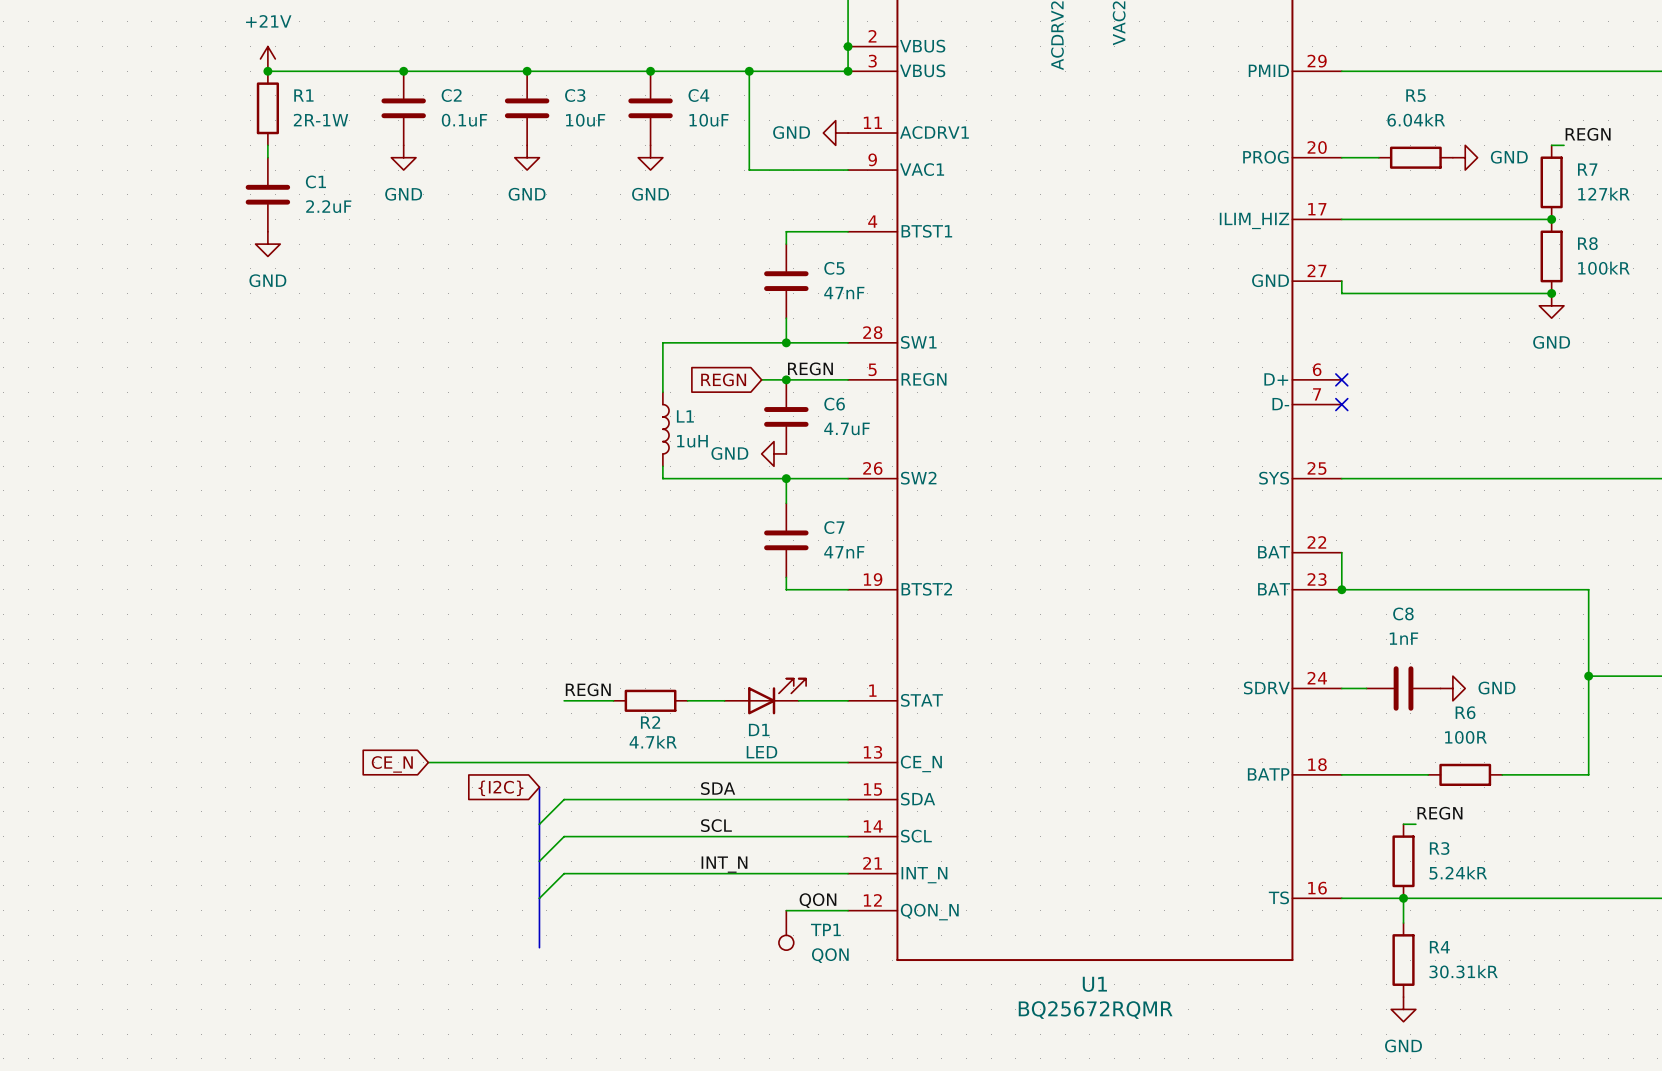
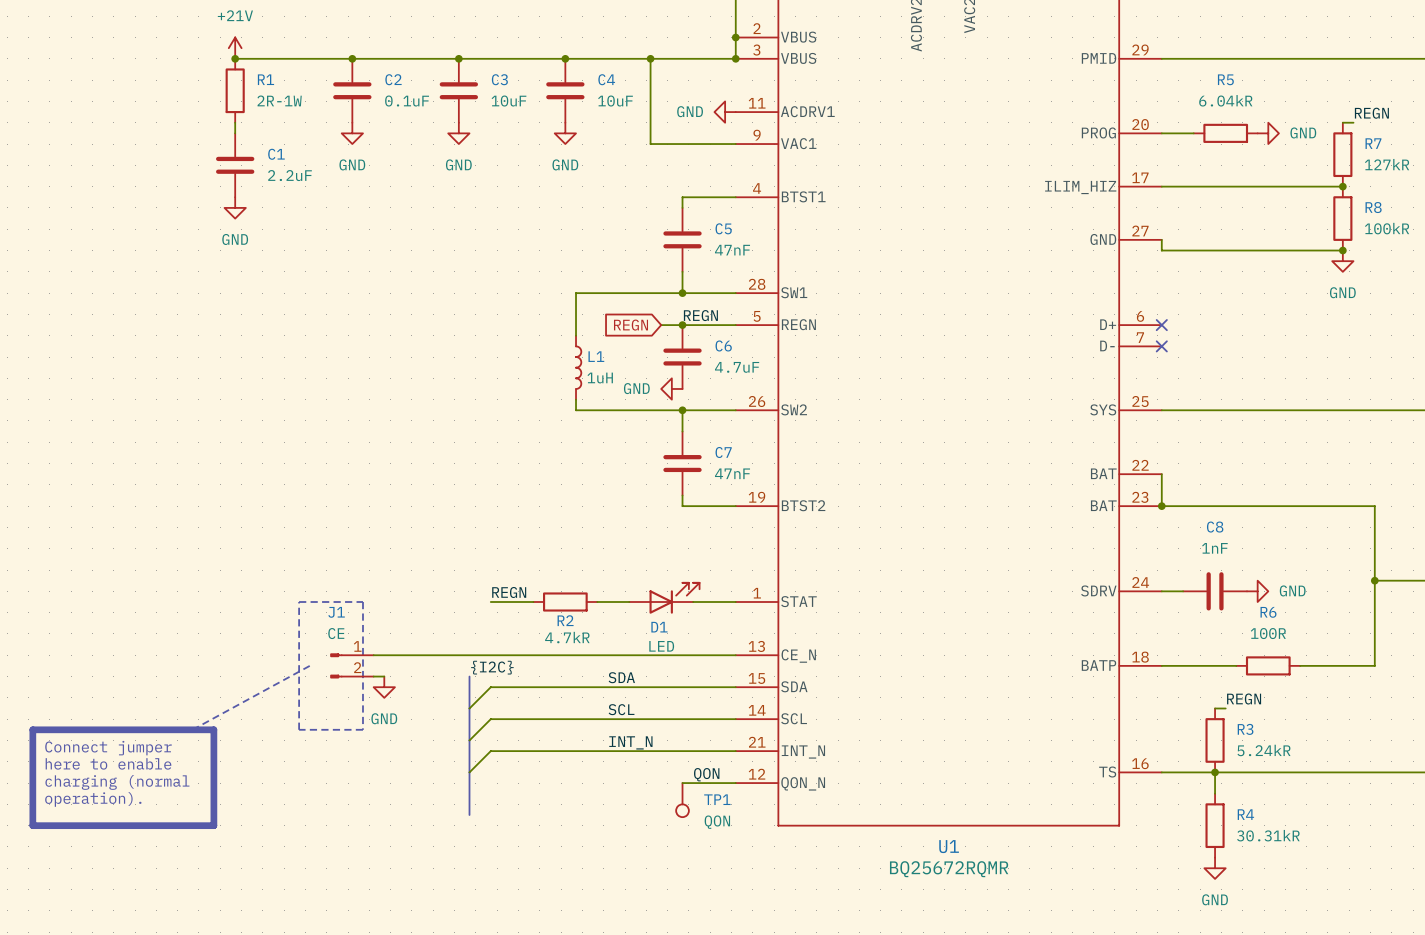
line: none -> (299, 602) (362, 602) (362, 729) (299, 729) (299, 602)
global label: CE_N (392, 764) -> none
line: none -> (309, 665) (192, 729)
J1: none -> CE (352, 665)
label: none -> {I2C} (492, 667)
wire: none -> (373, 676) (384, 676)
global label: {I2C} (501, 788) -> none
power symbol: none -> GND (384, 687)
line: none -> (32, 729) (213, 729) (213, 825) (32, 825) (32, 729)
text: none -> Connect jumper (108, 748)
text: none -> here to enable (108, 763)
text: none -> charging (normal (117, 782)
text: none -> operation). (93, 799)

